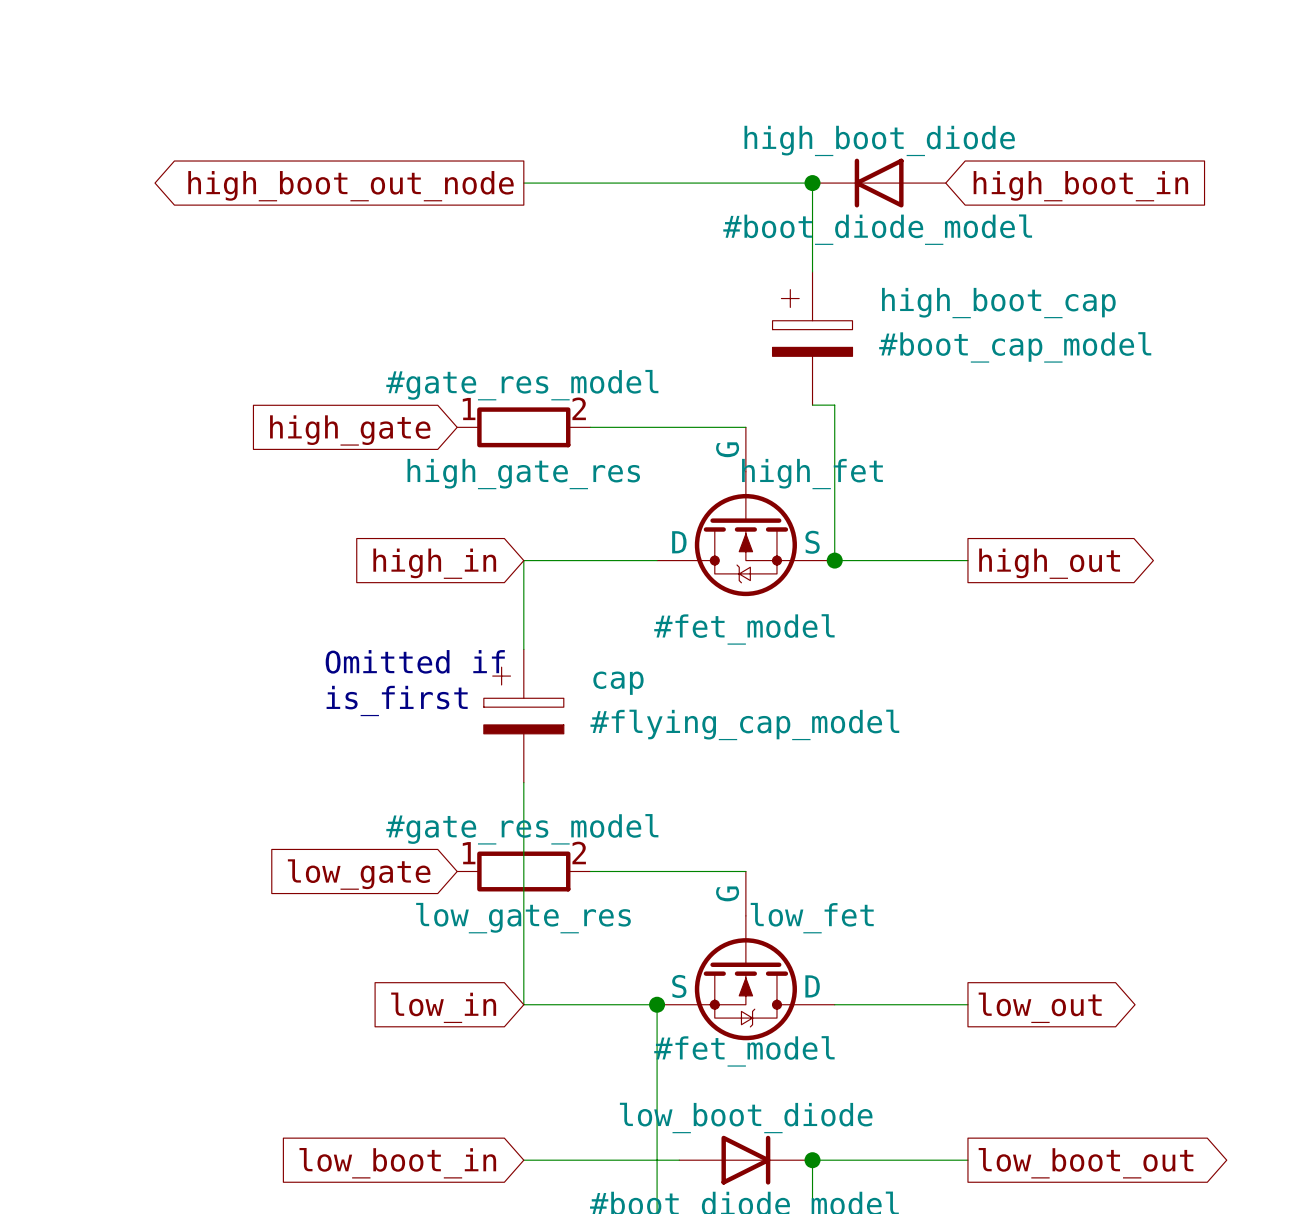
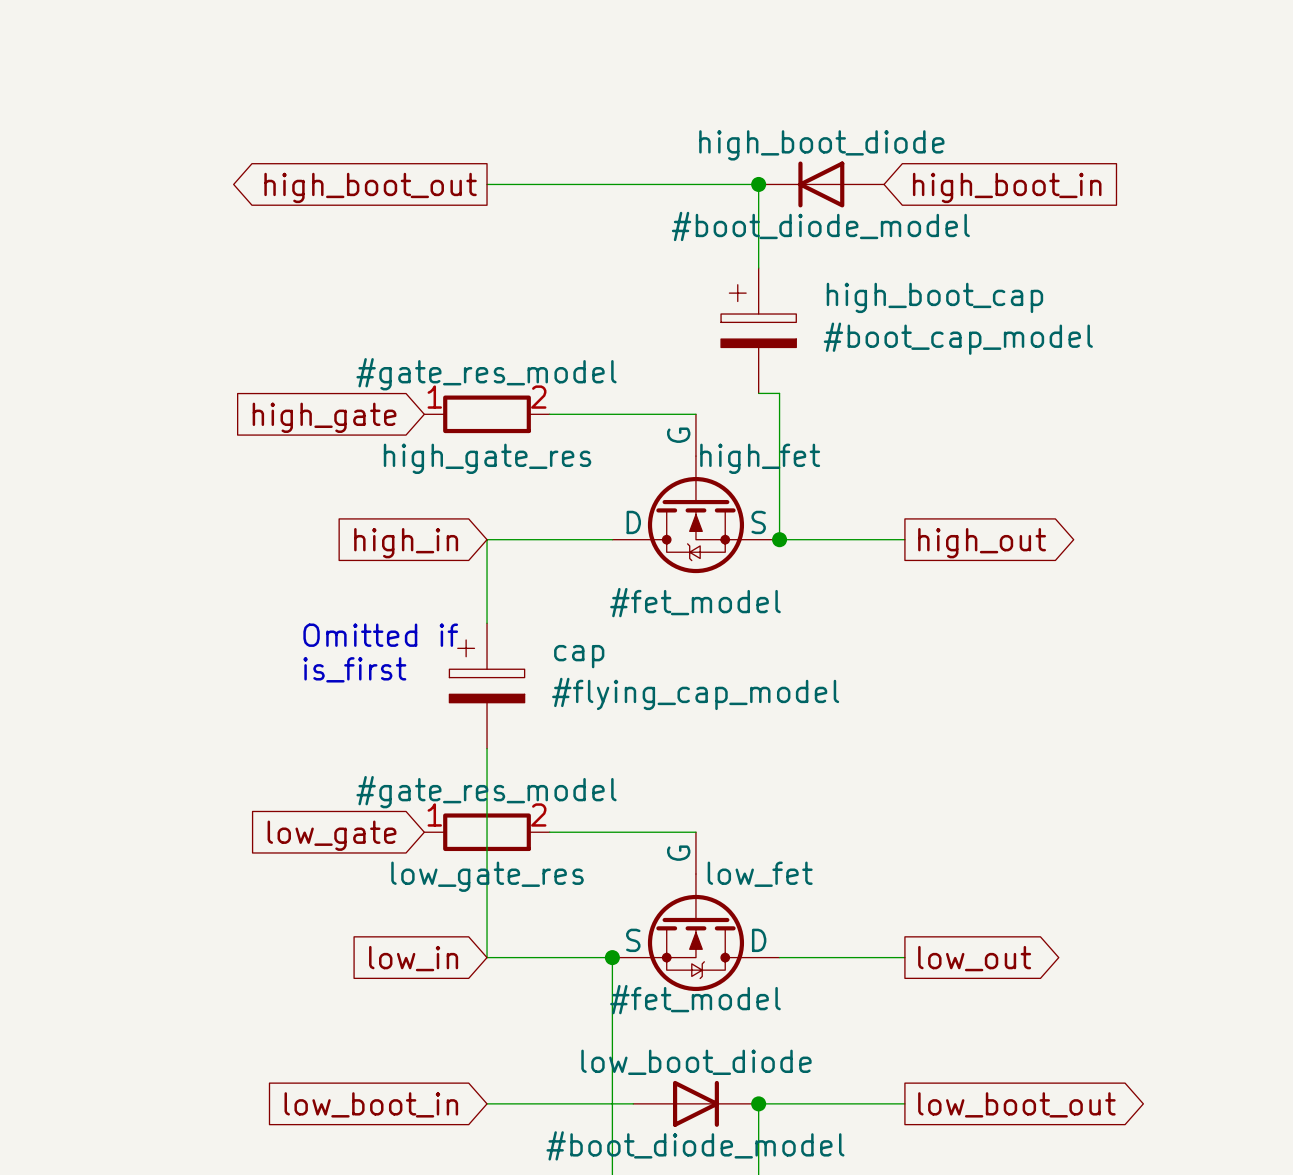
global label: high_boot_out_node (350, 186) -> high_boot_out (370, 187)

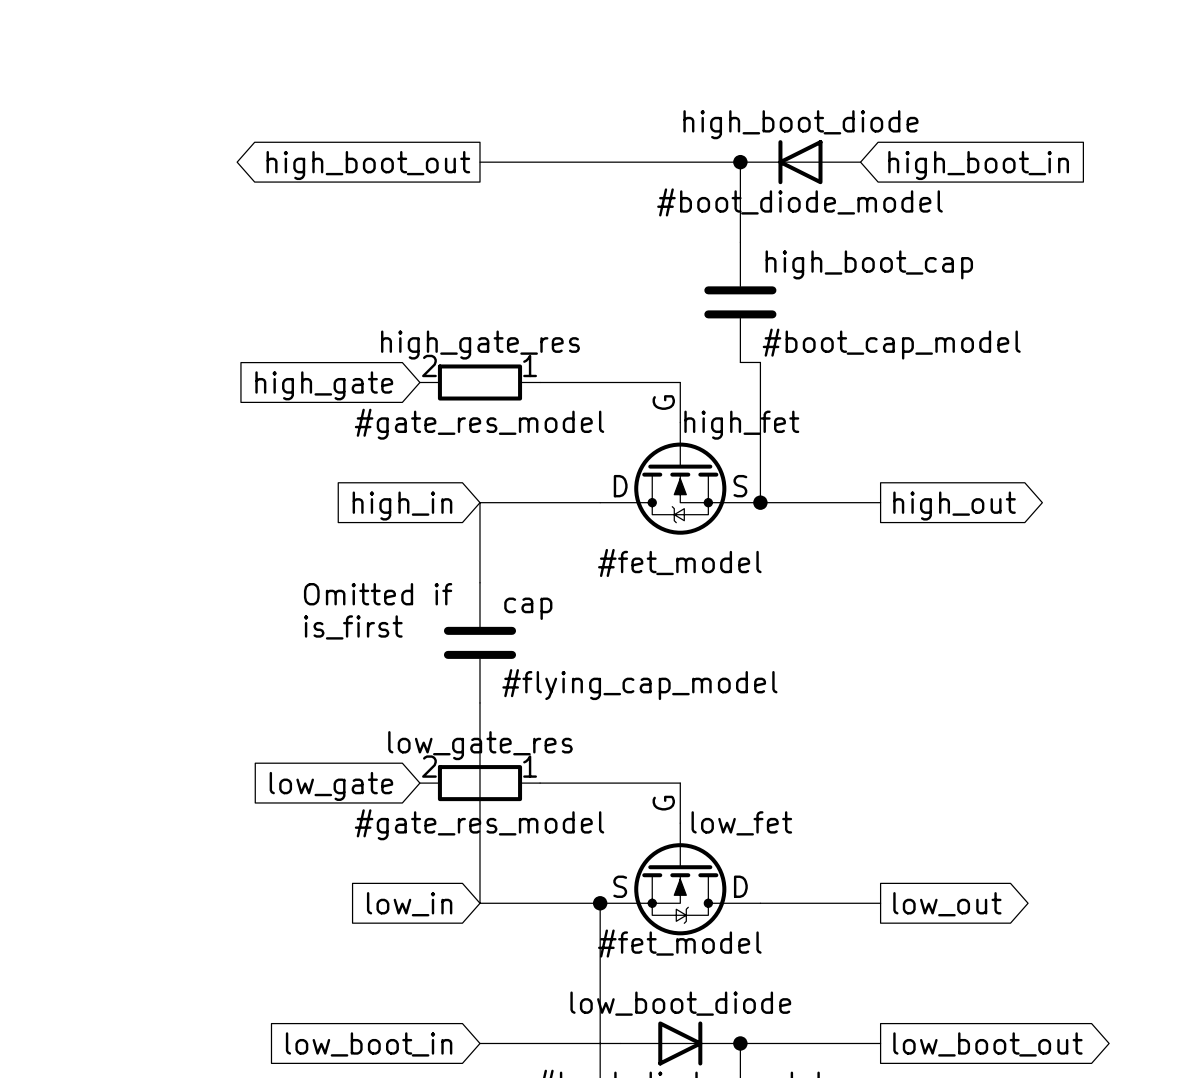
high_boot_cap symbol: [721, 268, 797, 394] -> [704, 242, 777, 363]
high_boot_cap name position: high_boot_cap (934, 297) -> high_boot_cap (869, 264)
high_boot_cap value position: #boot_cap_model (958, 338) -> #boot_cap_model (891, 344)
high_gate_res rotation: 0° (487, 414) -> 180° (479, 382)
cap symbol: [449, 623, 525, 749] -> [443, 582, 517, 703]
cap name position: cap (579, 656) -> cap (528, 608)
cap value position: #flying_cap_model (695, 693) -> #flying_cap_model (639, 684)
low_gate_res rotation: 0° (487, 832) -> 180° (479, 783)

